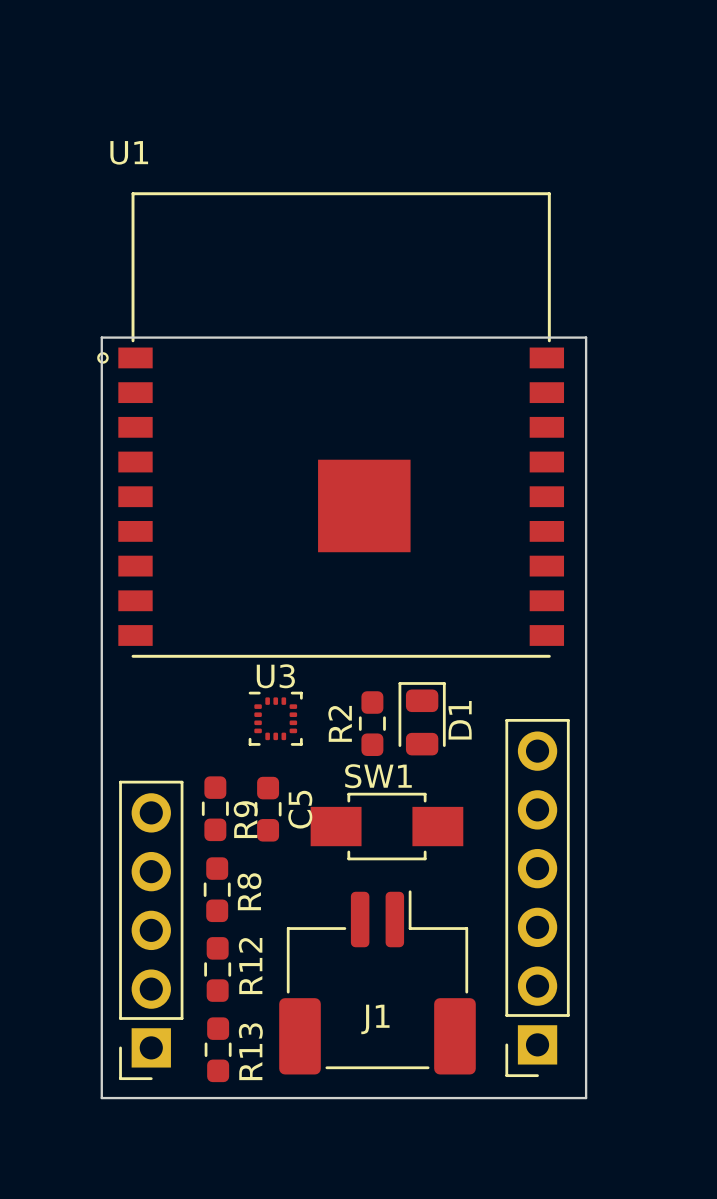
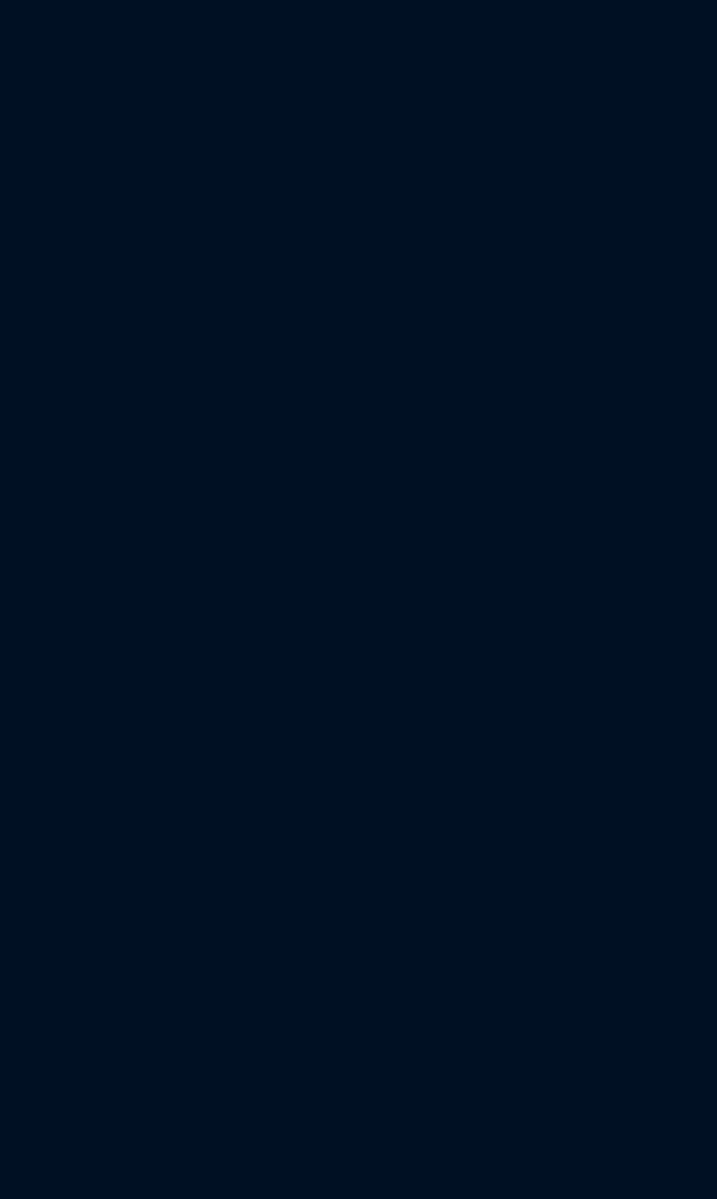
board edge: (101, 337) (586, 337) (586, 1098) (101, 1098) (101, 337) -> none
U1: (330, 425) -> none
U3: (275, 718) -> none
D1: (422, 718) -> none
R2: (372, 723) -> none
R9: (215, 808) -> none
C5: (268, 809) -> none
SW1: (386, 826) -> none
R8: (217, 889) -> none
part: (537, 898) -> none
part: (151, 930) -> none
R12: (217, 969) -> none
J1: (377, 982) -> none
R13: (218, 1049) -> none

